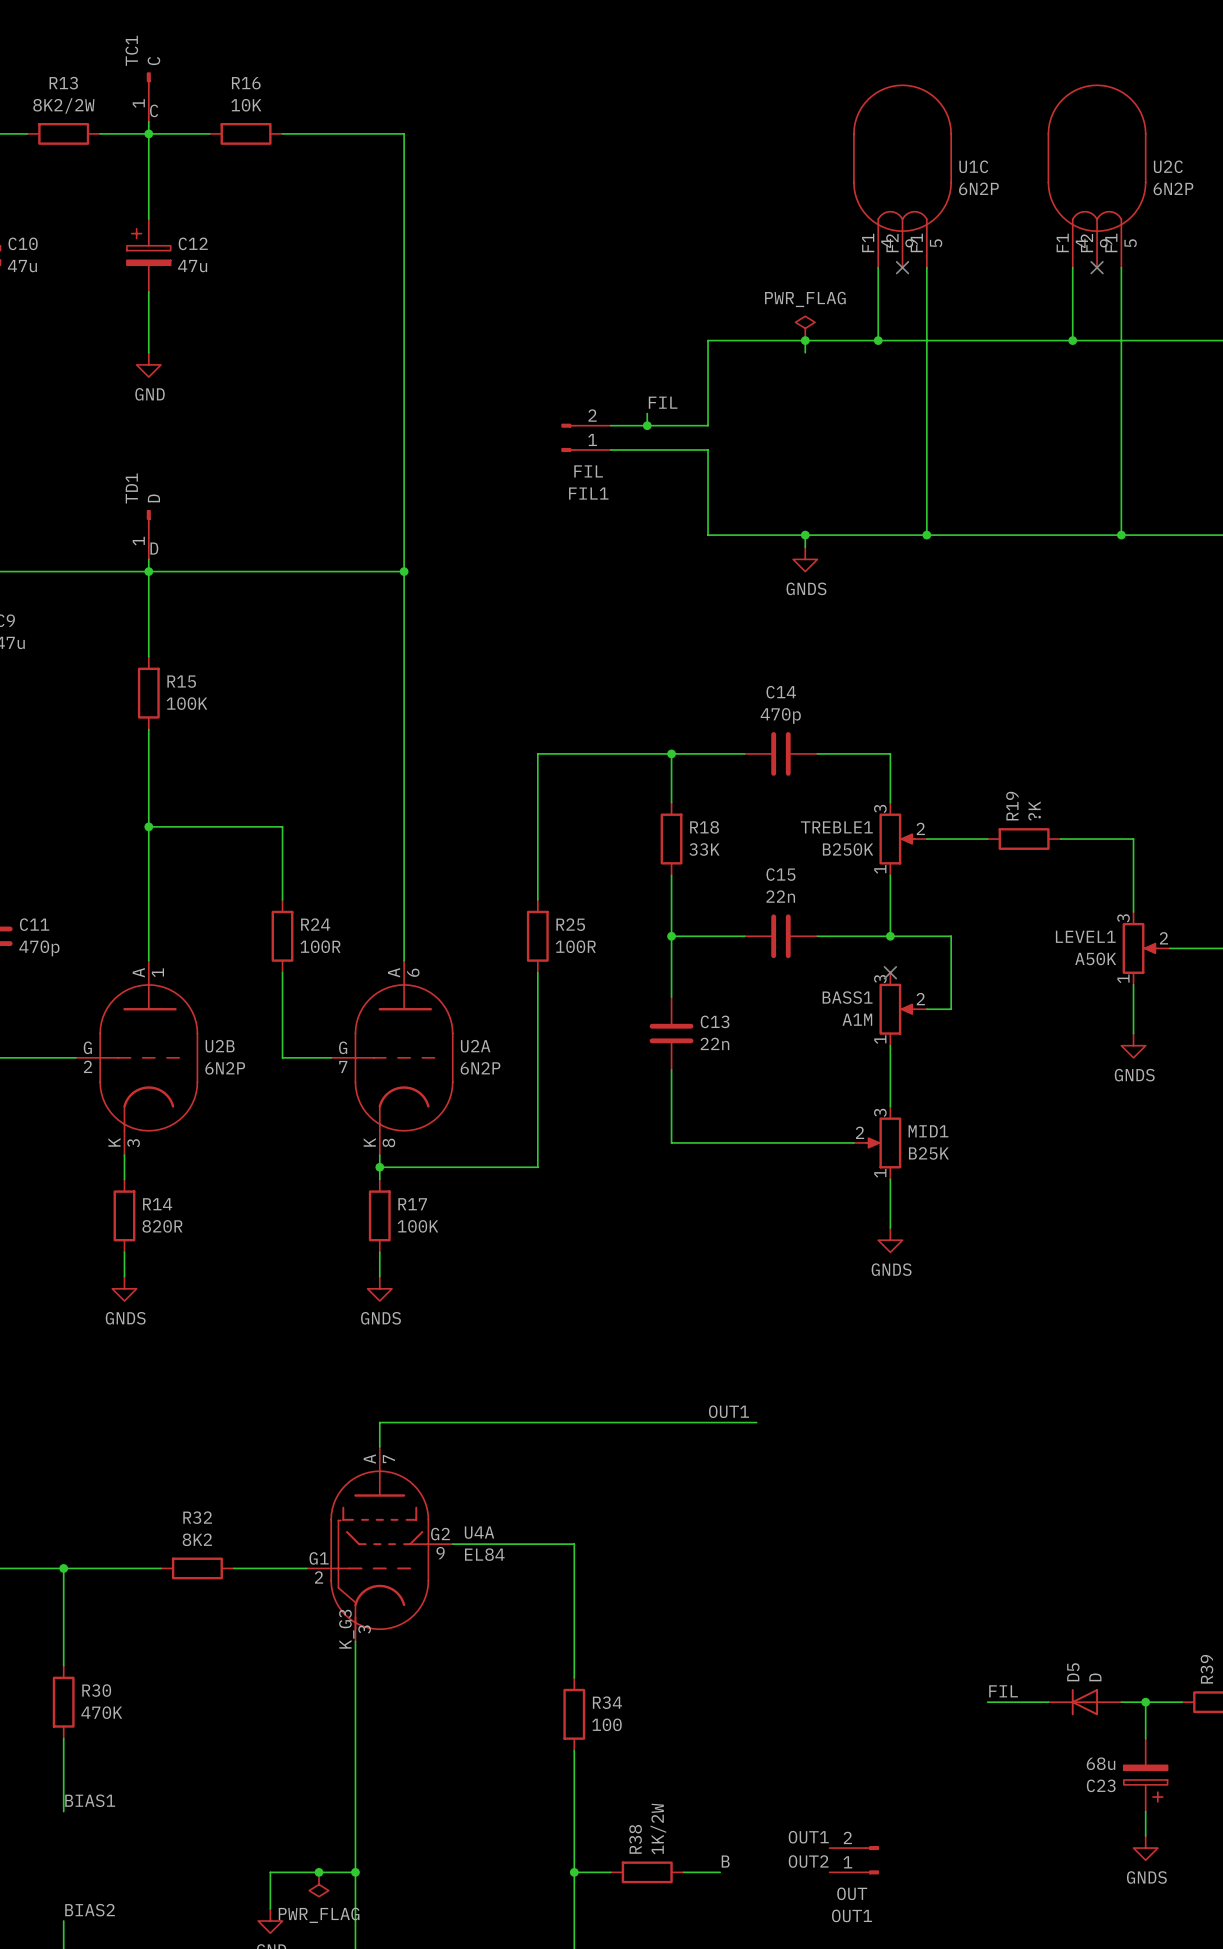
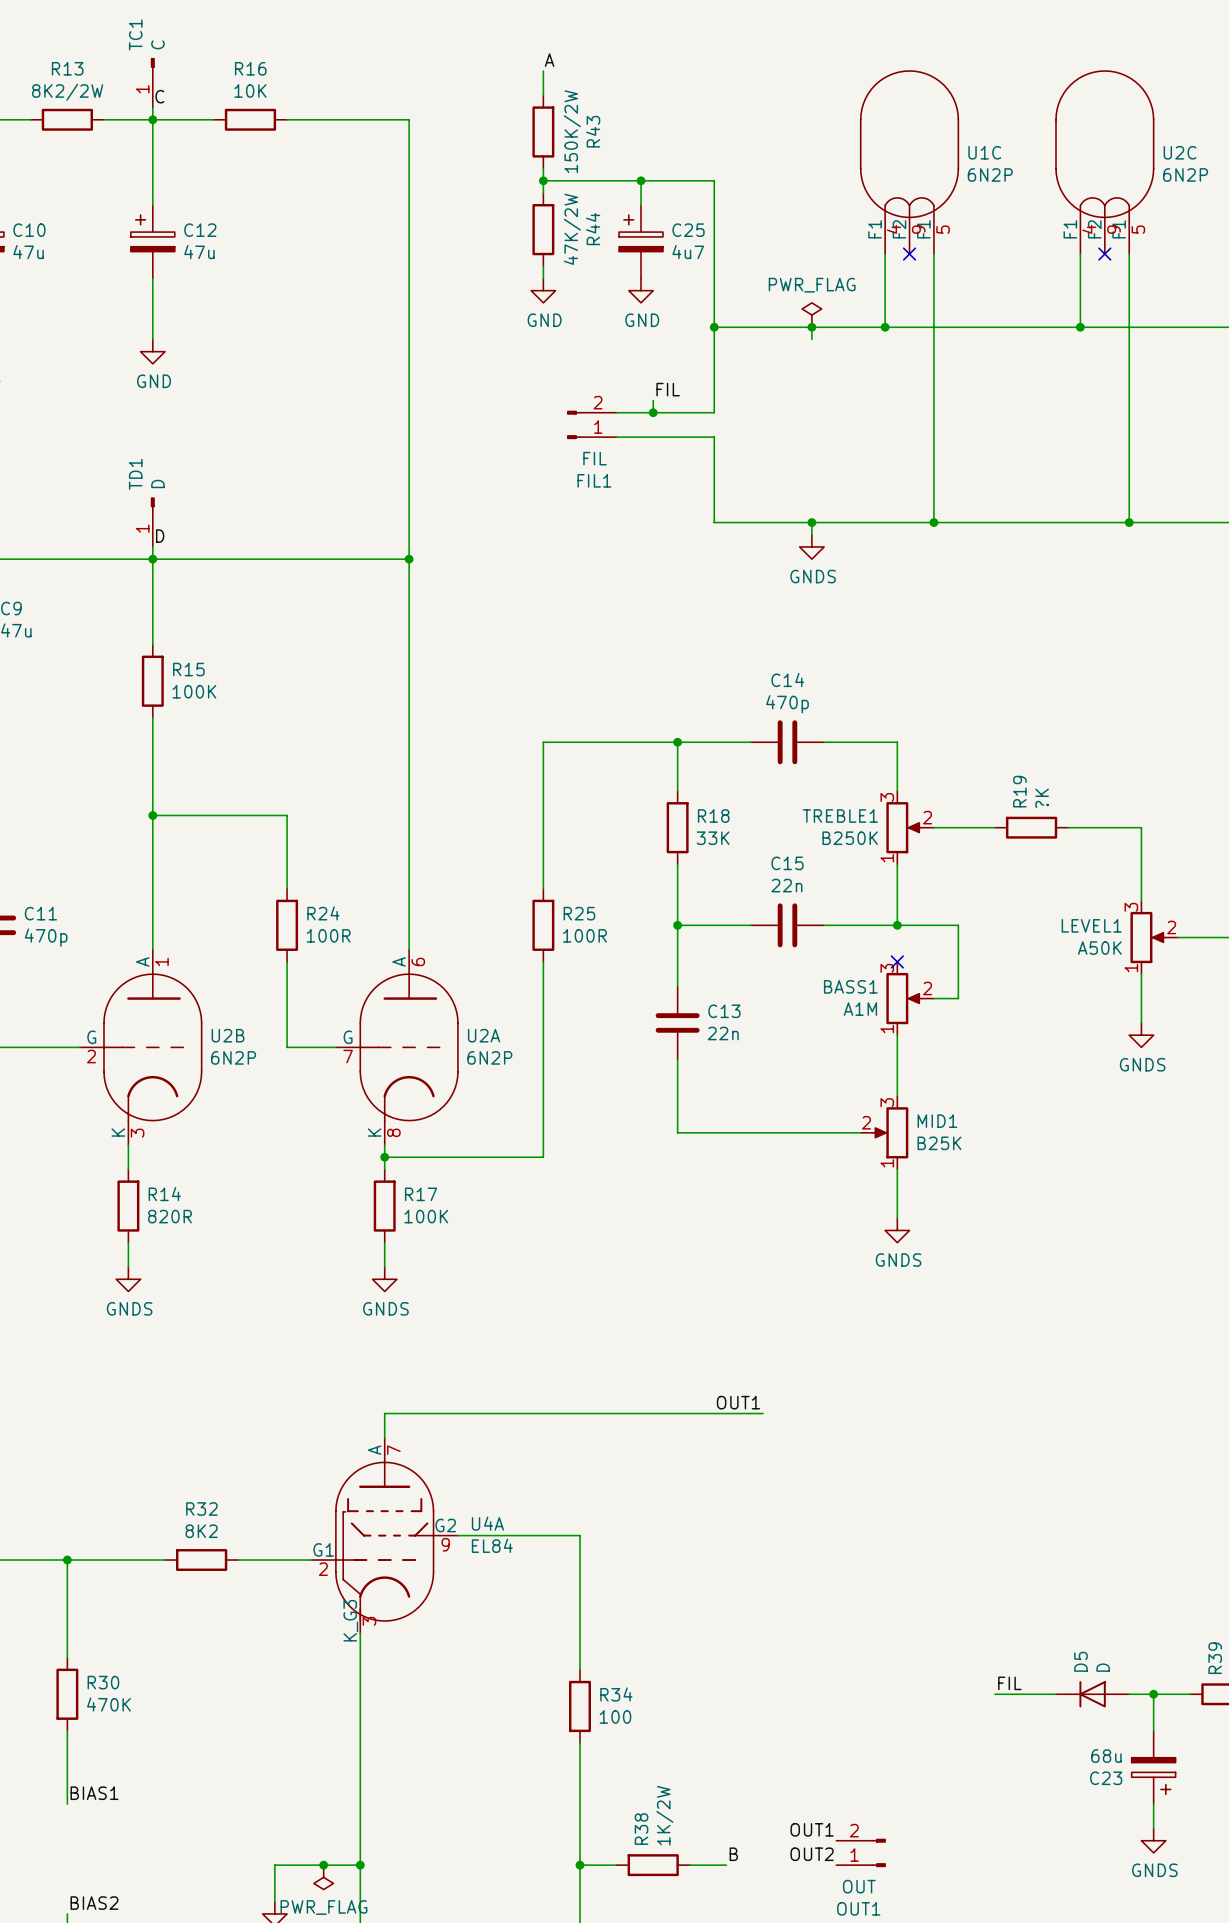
label: none -> A (549, 60)
wire: none -> (543, 70) (543, 95)
R43: none -> 150K/2W (543, 131)
wire: none -> (543, 168) (543, 193)
wire: none -> (543, 180) (714, 180) (714, 327)
junction: none -> (543, 180)
wire: none -> (641, 180) (641, 205)
junction: none -> (641, 180)
R44: none -> 47K/2W (543, 229)
C25: none -> 4u7 (641, 241)
wire: none -> (543, 266) (543, 278)
power symbol: none -> GND (543, 290)
power symbol: none -> GND (641, 290)
junction: none -> (714, 327)

